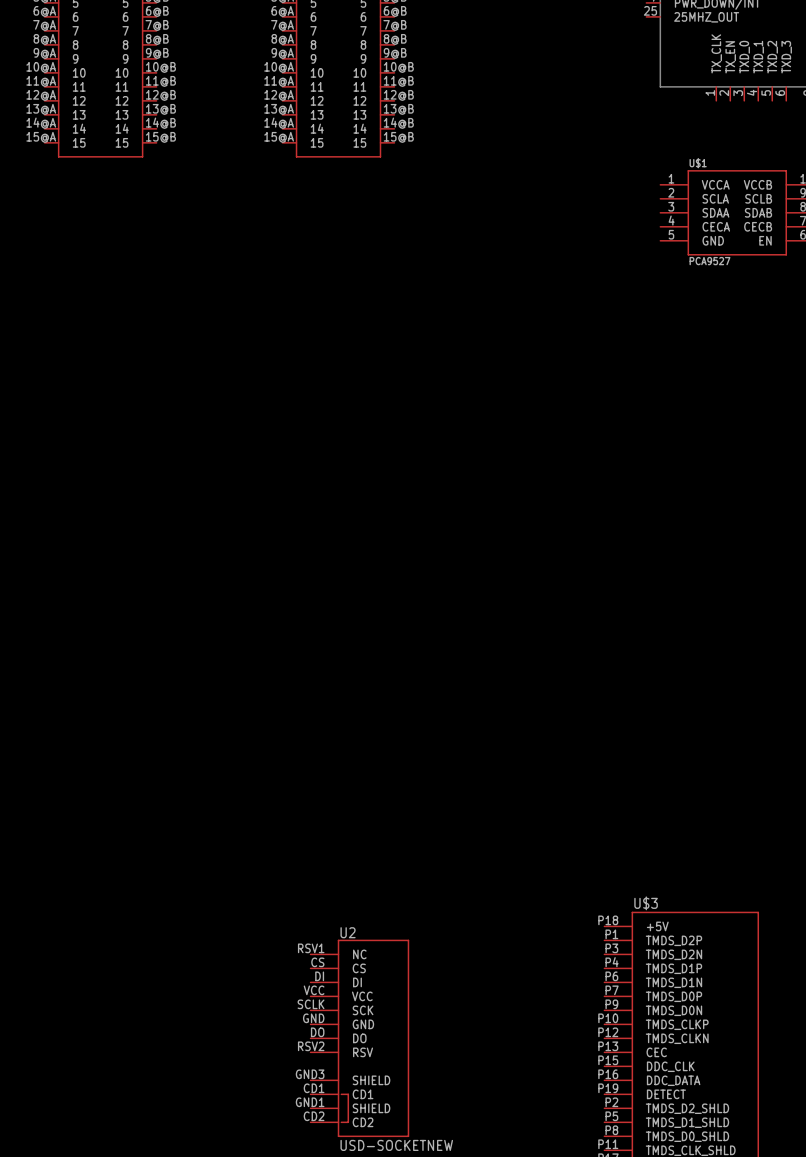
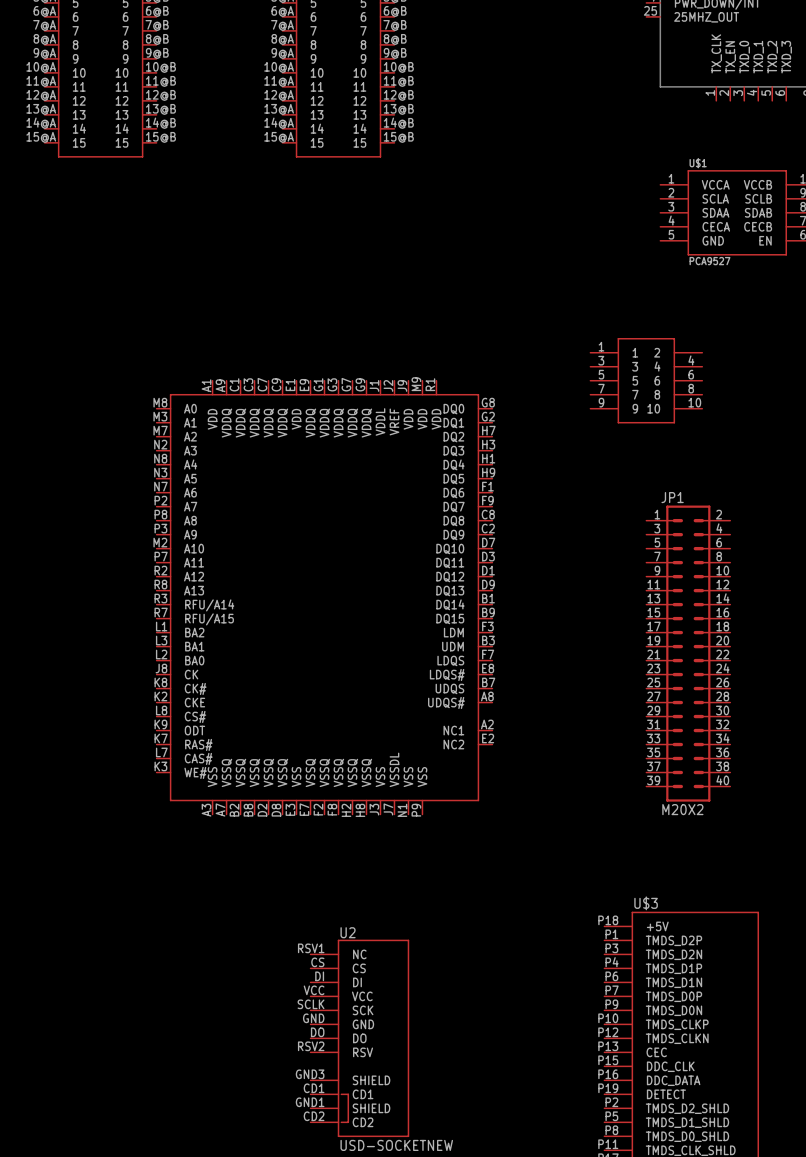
part: none -> (646, 380)
part: none -> (324, 597)
JP1: none -> M20X2 (688, 653)

